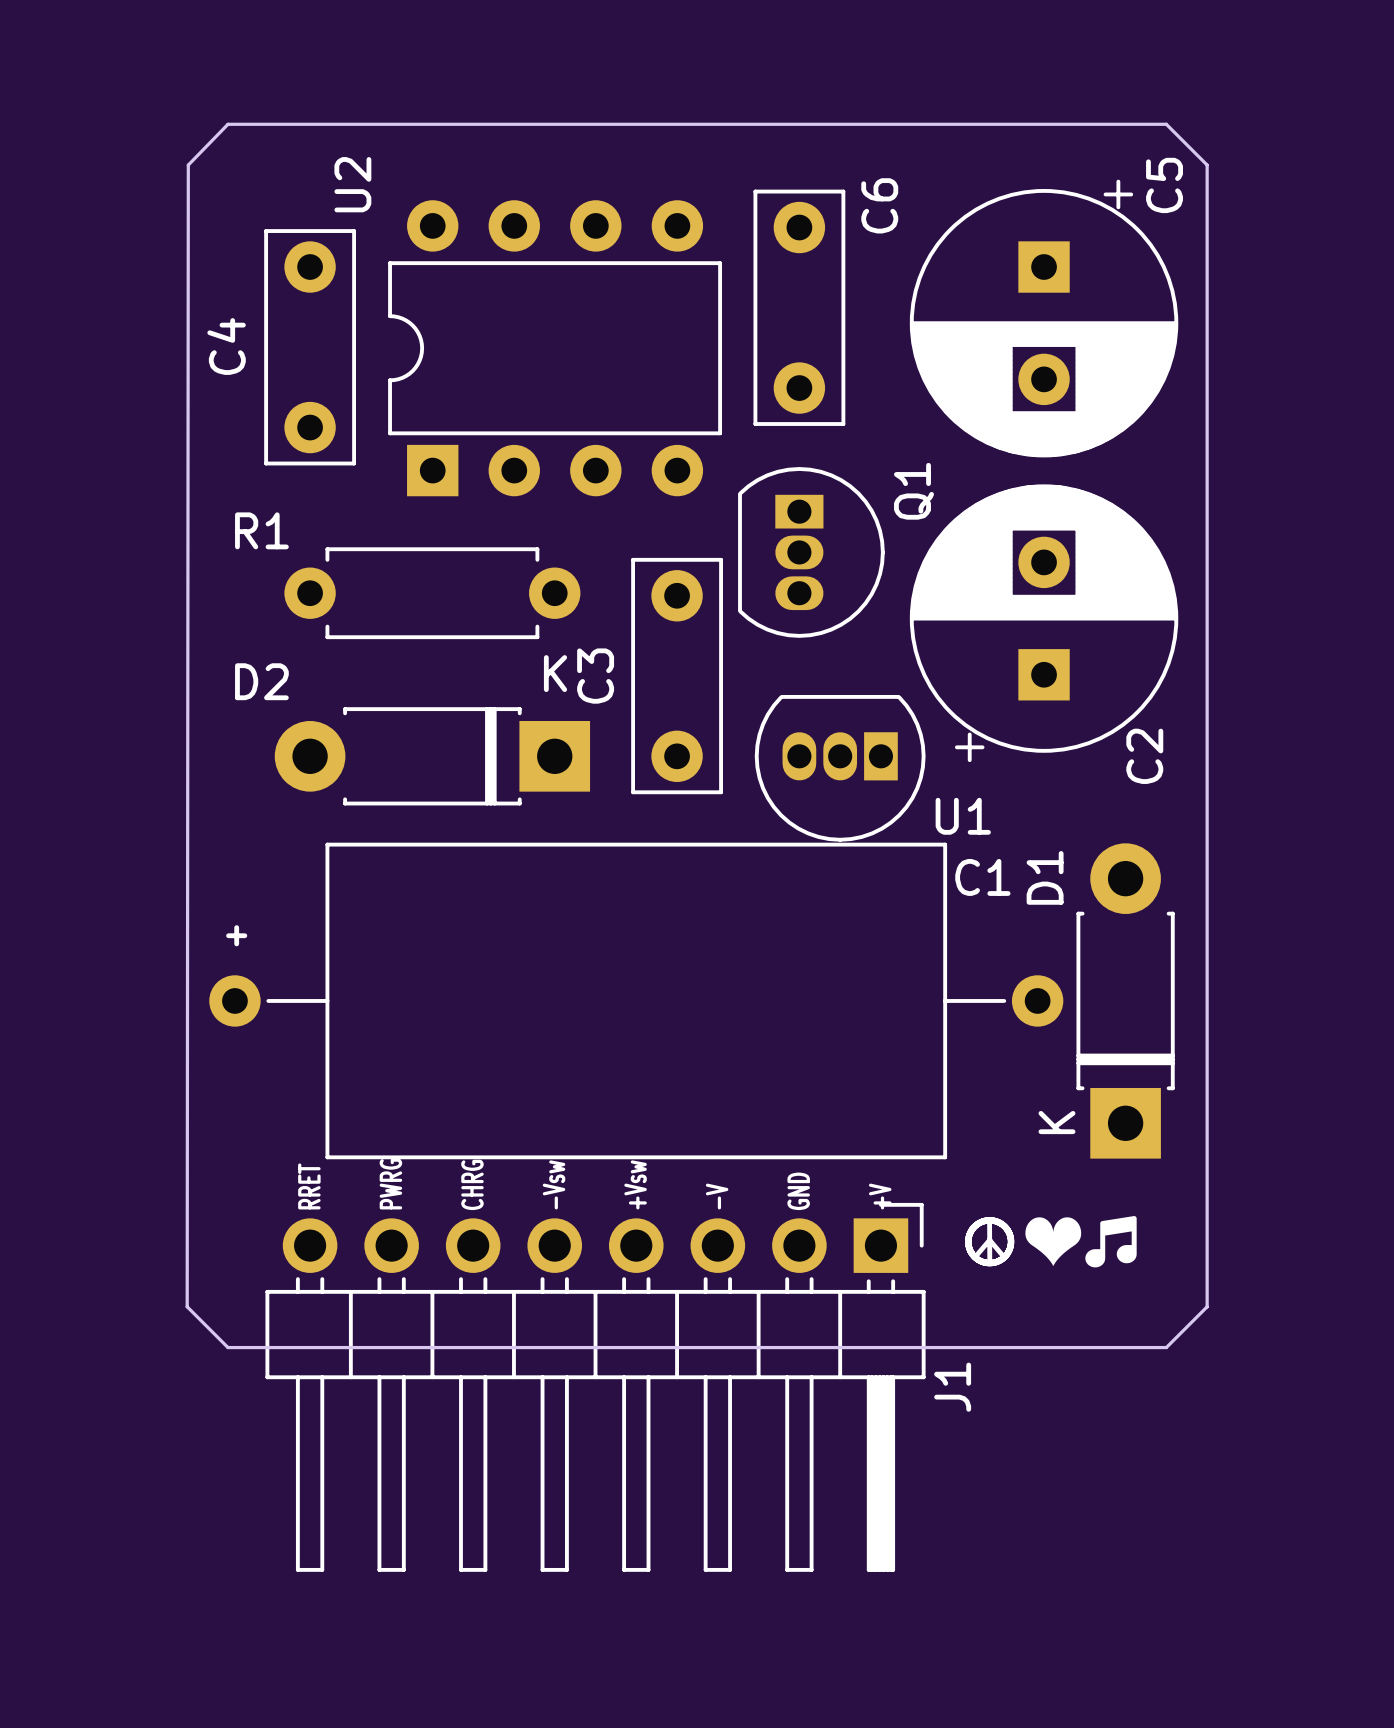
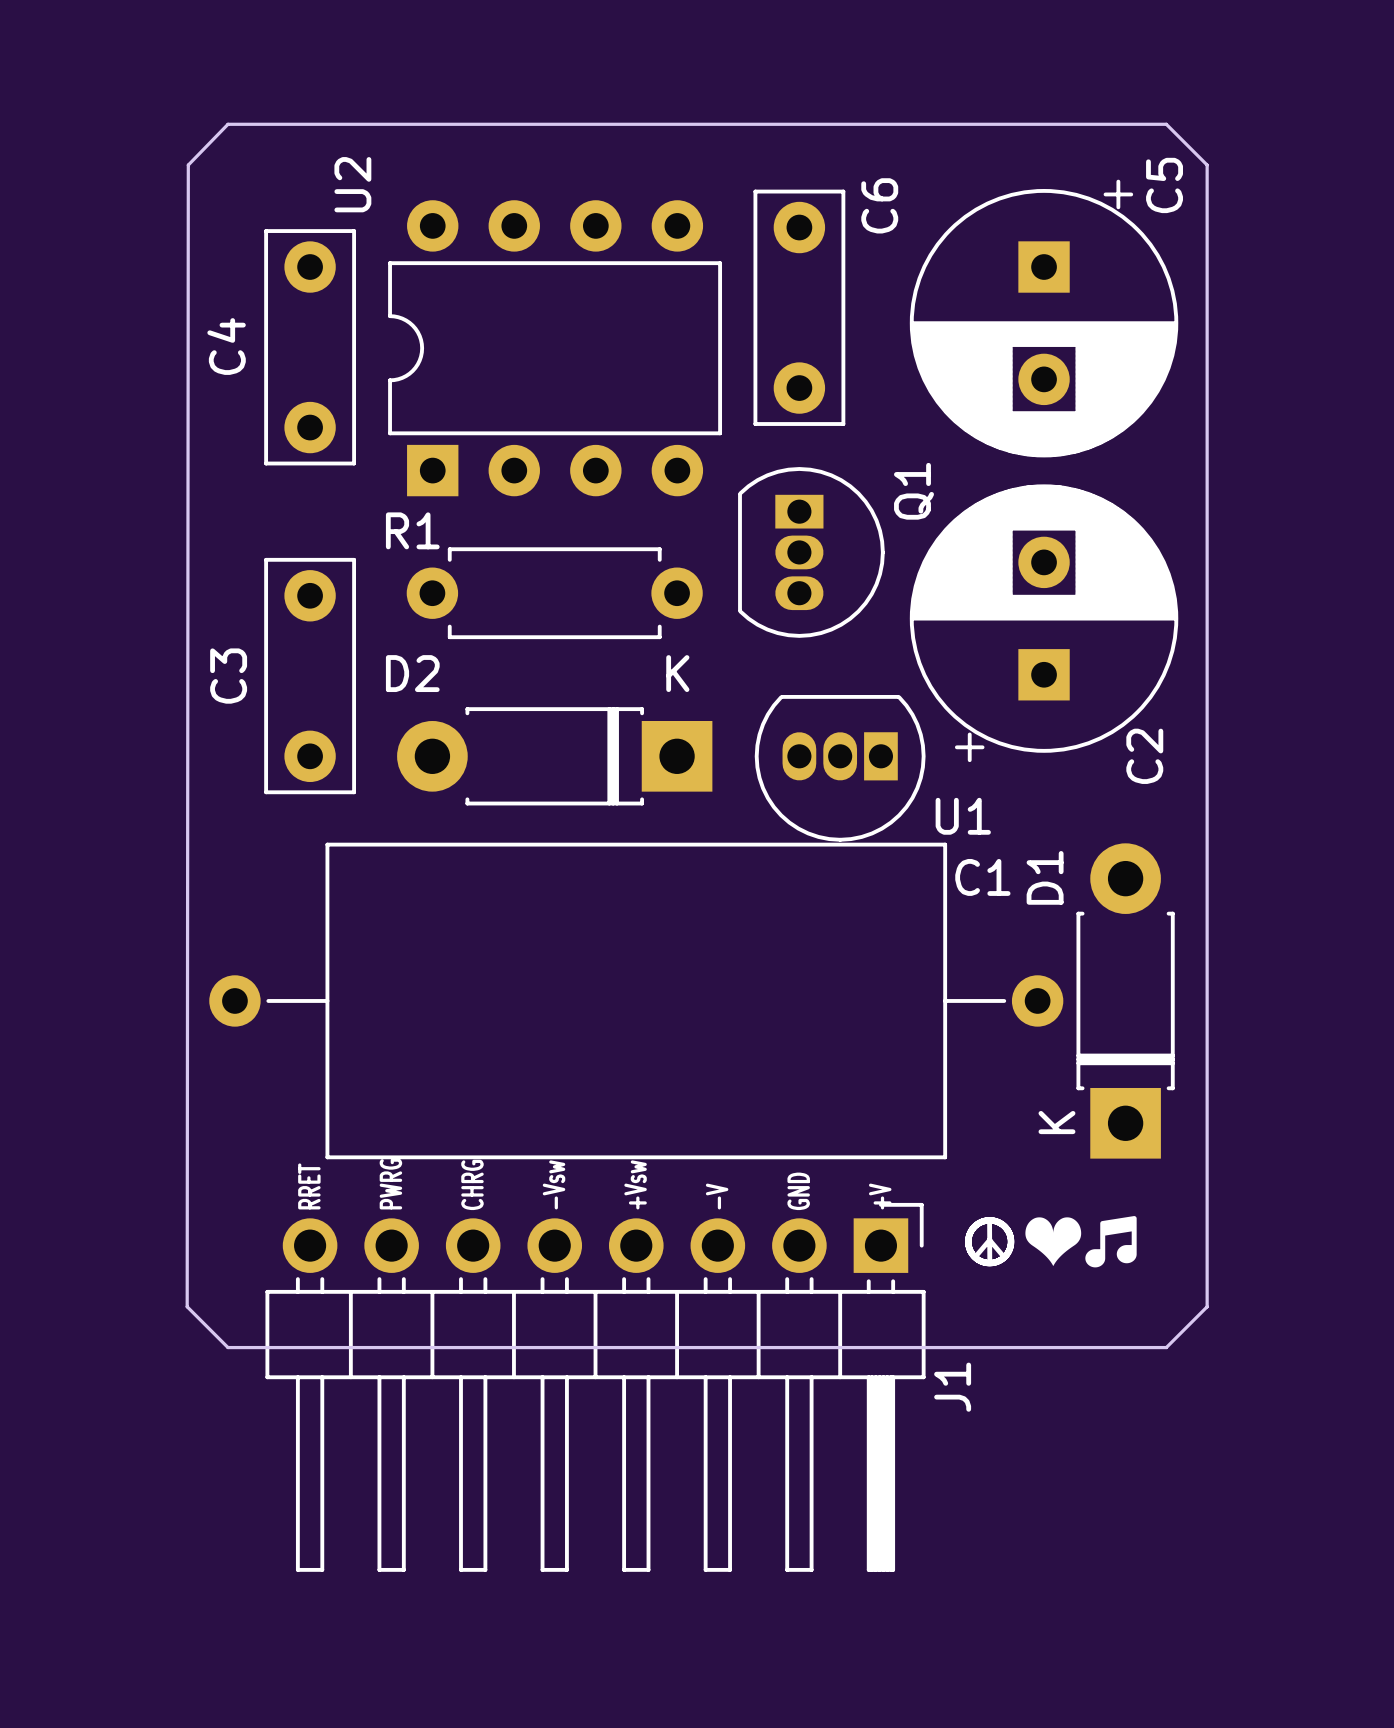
R1 name position: R1 (261, 530) -> R1 (412, 530)
R1 position: (432, 593) -> (554, 593)
C3 position: (677, 676) -> (310, 676)
D2 name position: D2 (261, 681) -> D2 (412, 673)
D2 position: (432, 756) -> (554, 756)
line: (236, 927) (236, 943) -> none
line: (228, 935) (244, 935) -> none

